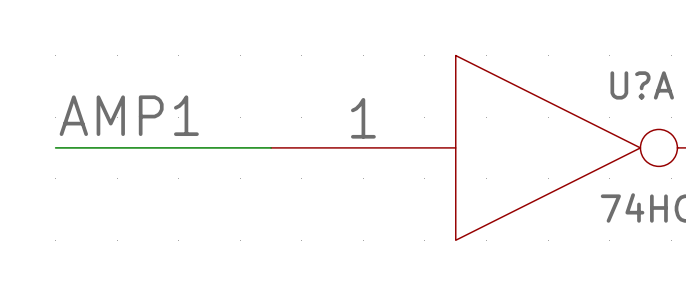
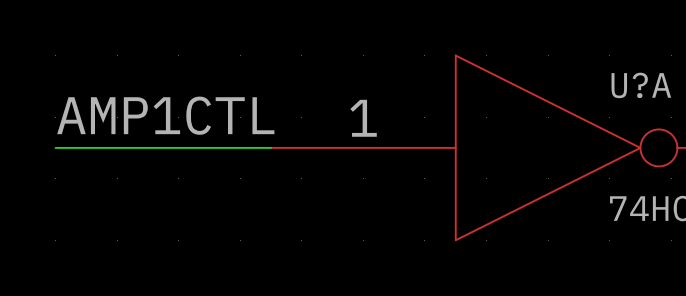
label: AMP1 (129, 115) -> AMP1CTL (165, 115)

